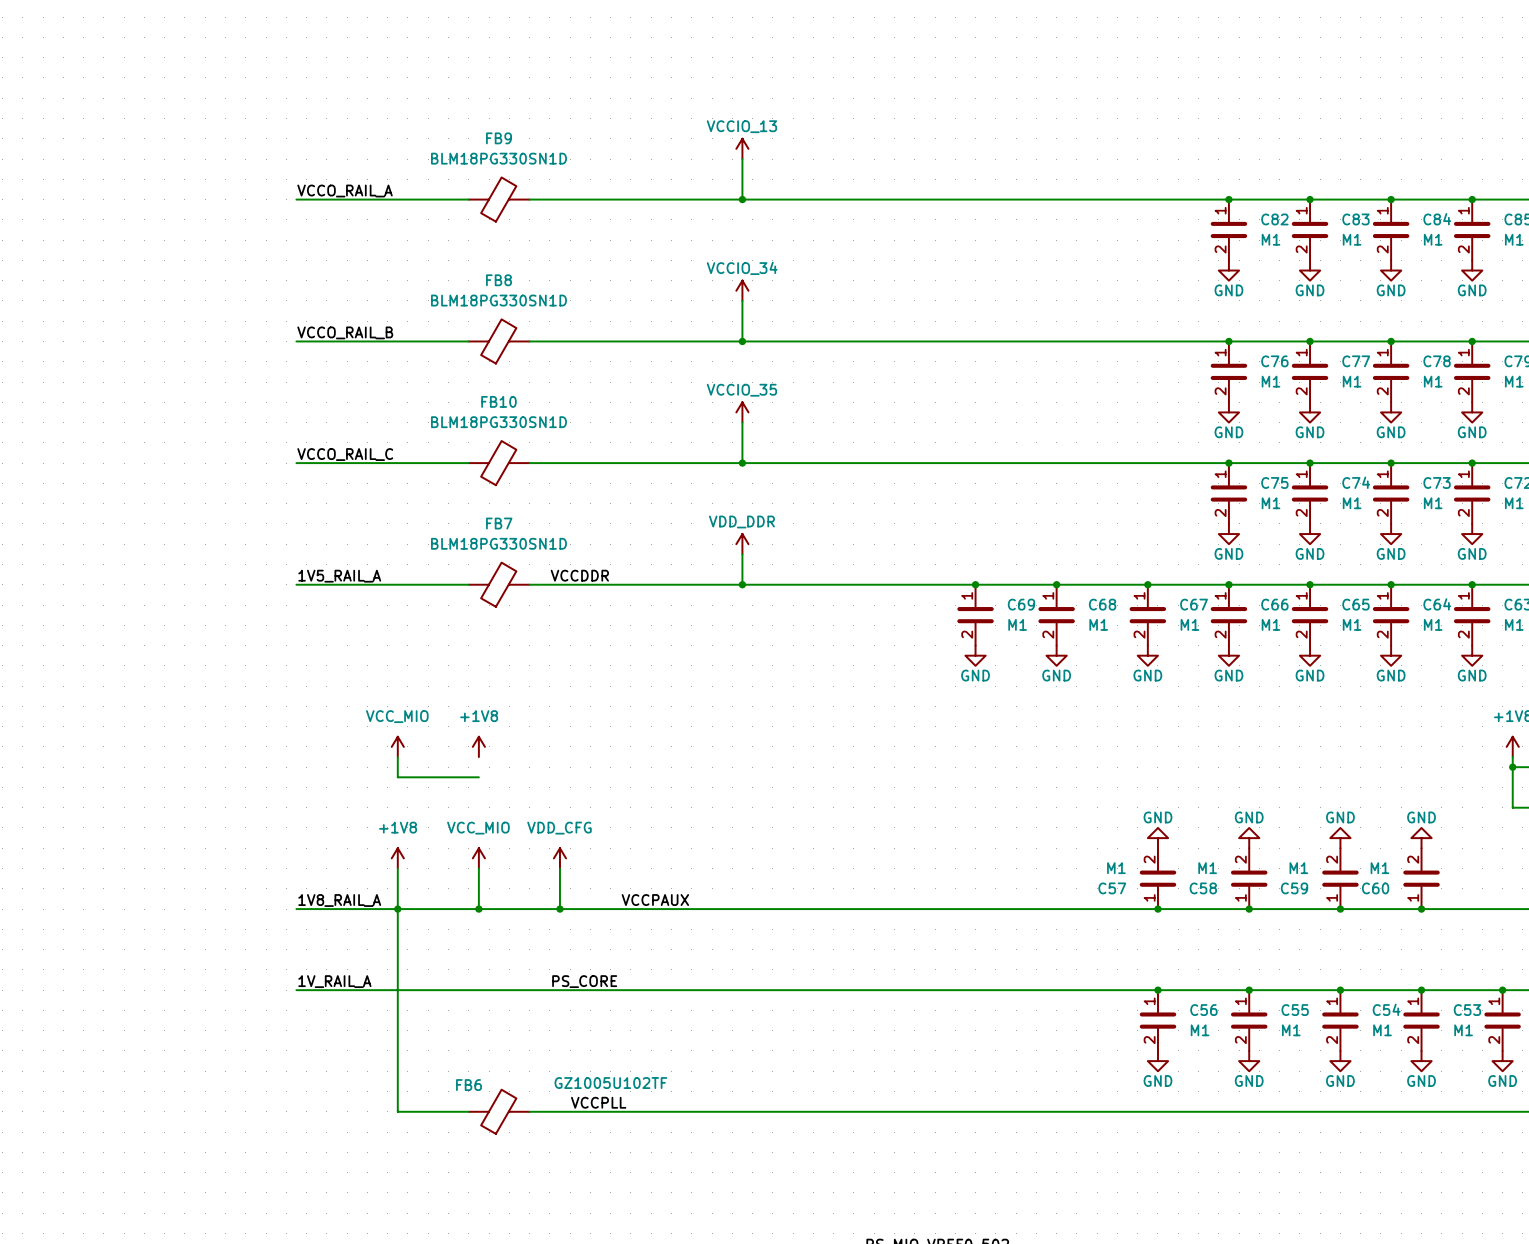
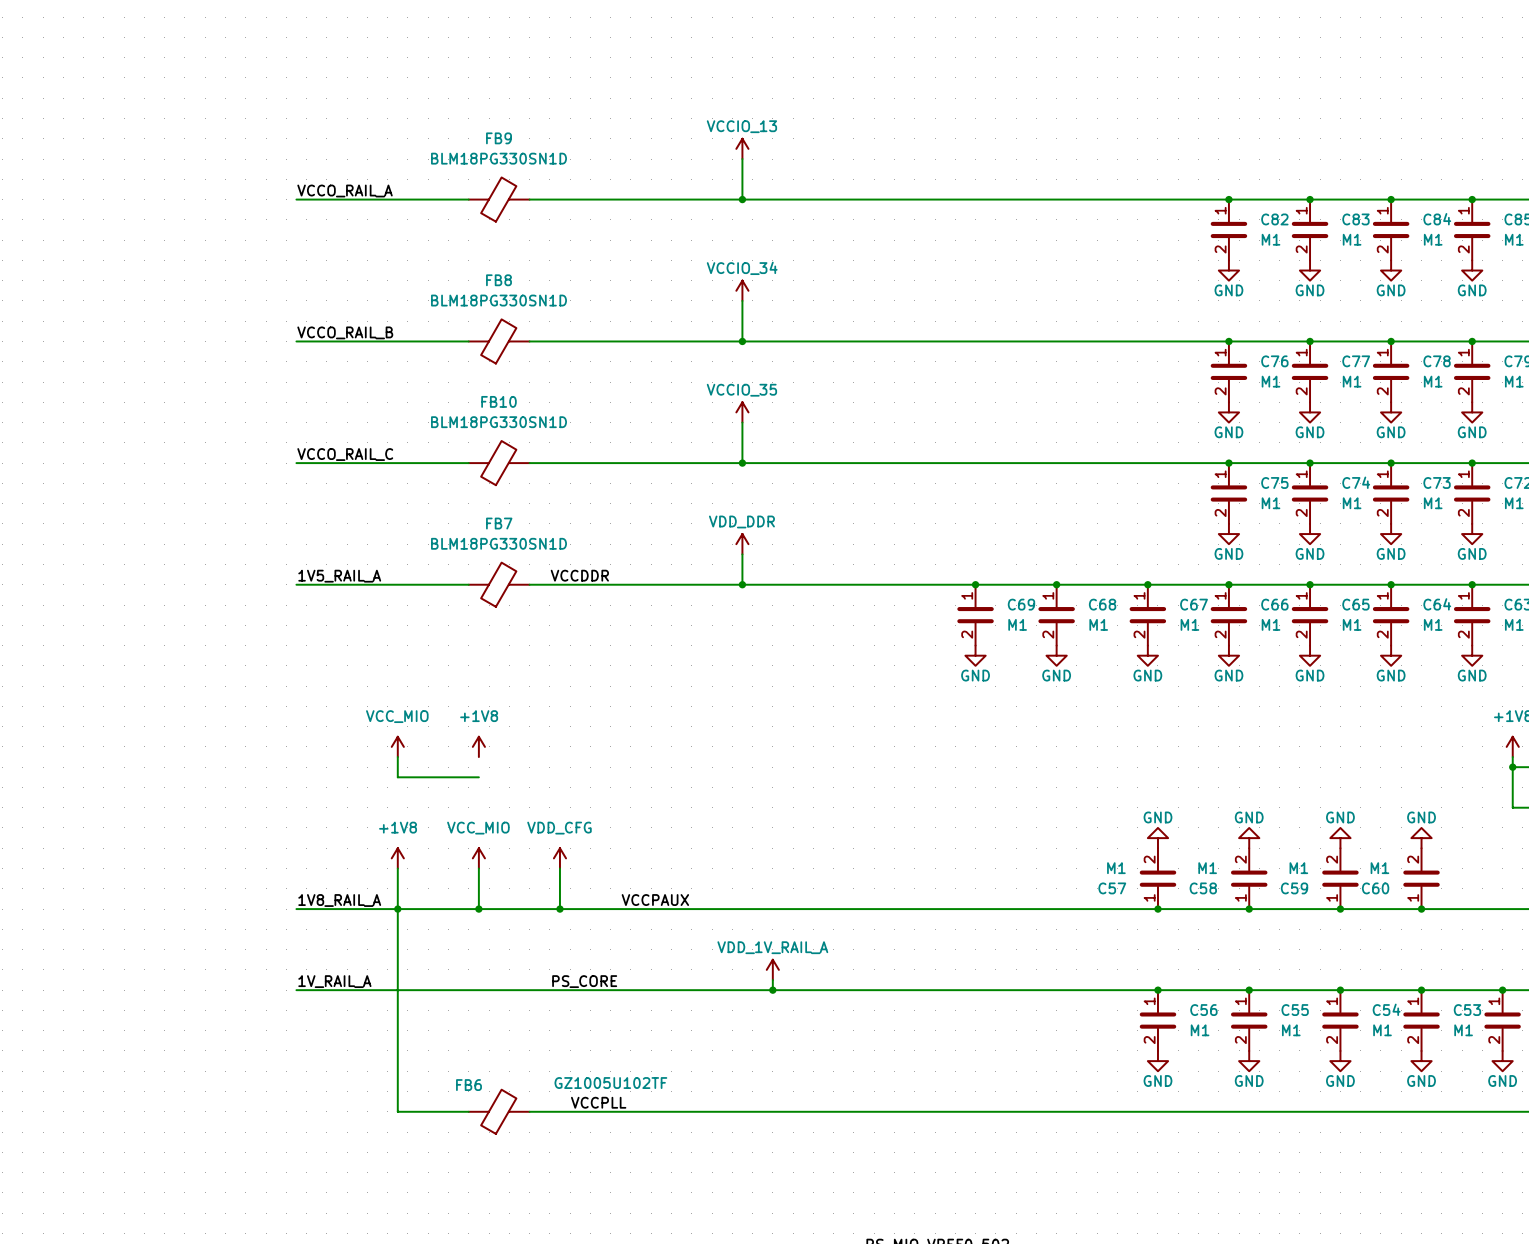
power symbol: none -> VDD_1V_RAIL_A (772, 969)
wire: none -> (772, 980) (772, 990)
junction: none -> (772, 990)

